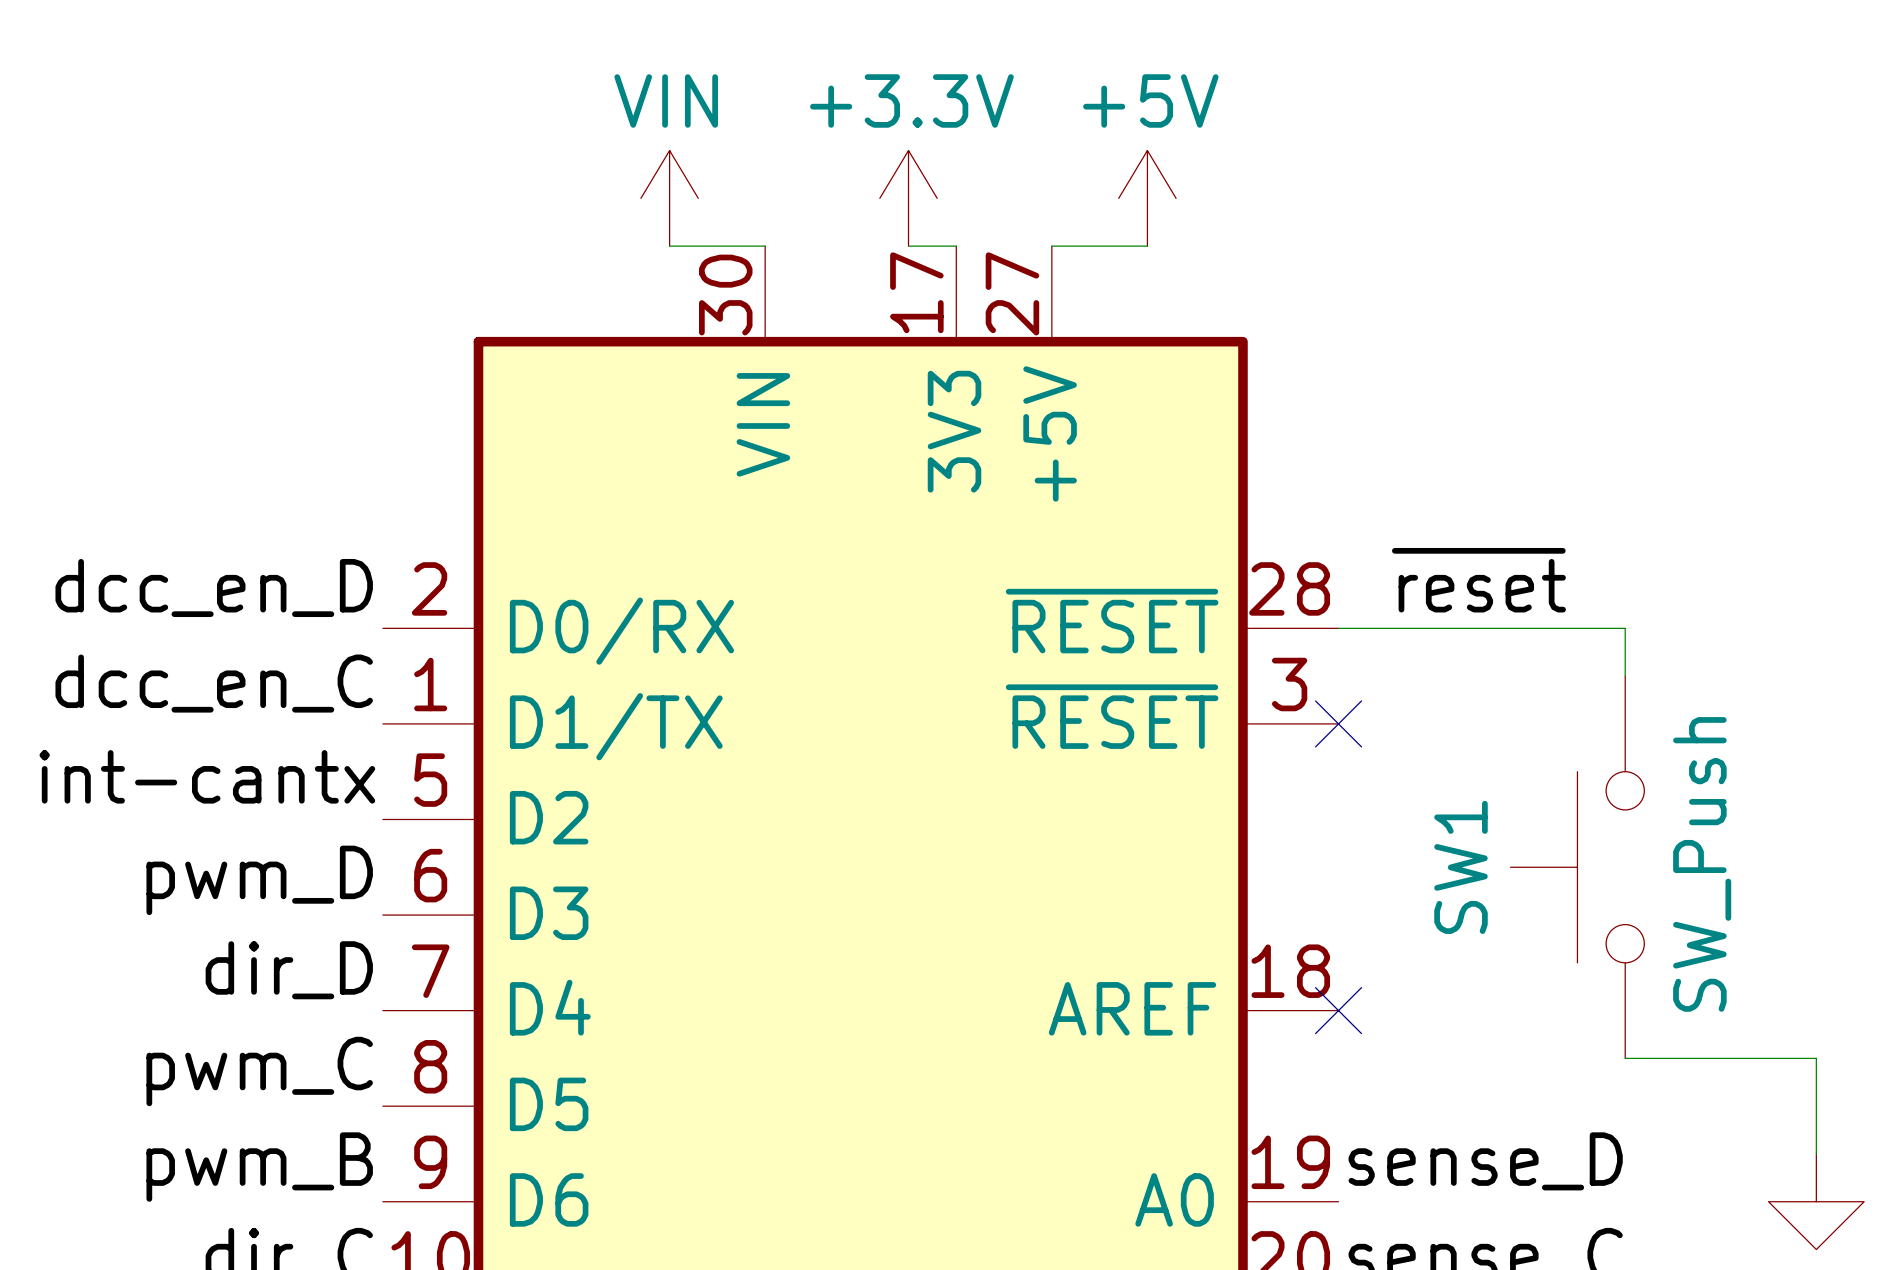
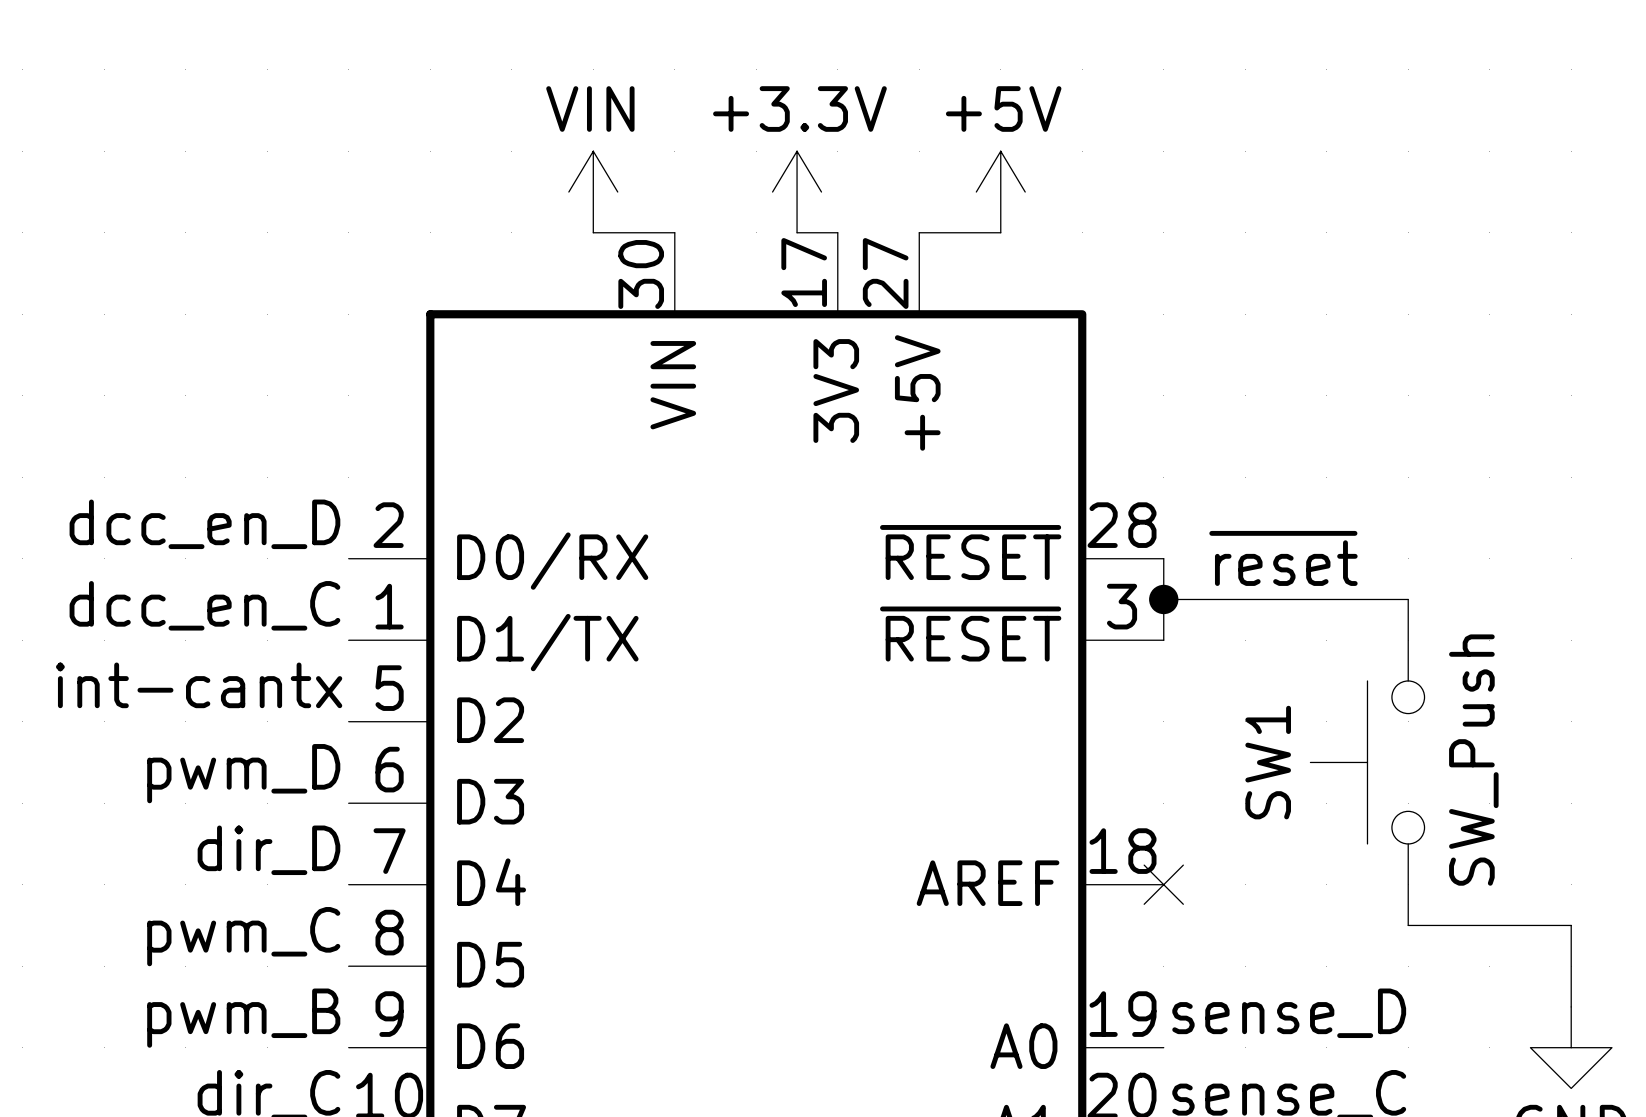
label position: ~{reset} (1478, 580) -> ~{reset} (1283, 558)
wire: (1338, 628) (1625, 628) (1625, 676) -> (1163, 599) (1408, 599)
wire: none -> (1163, 558) (1163, 640)
junction: none -> (1163, 599)
no-connect mark: (1338, 723) -> none

